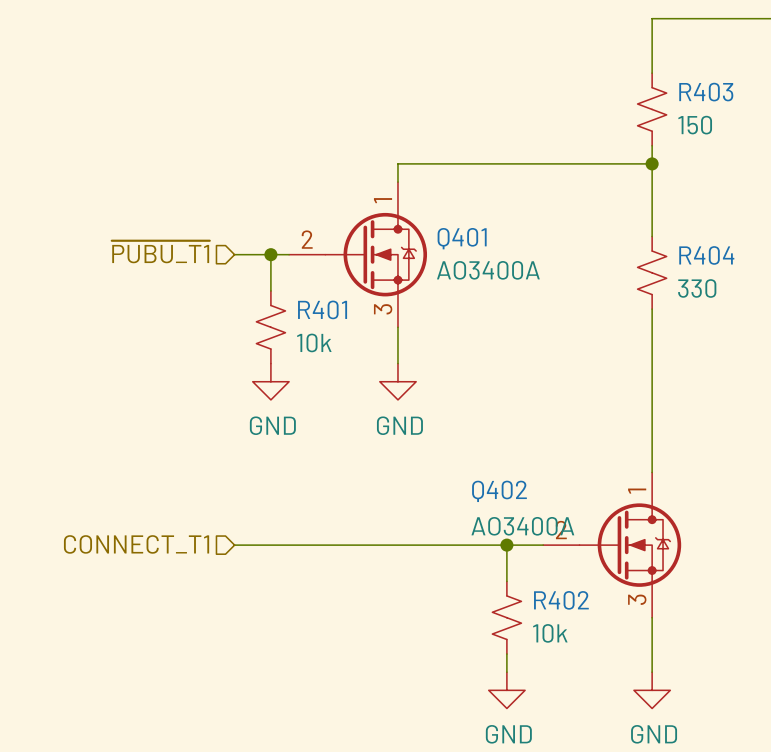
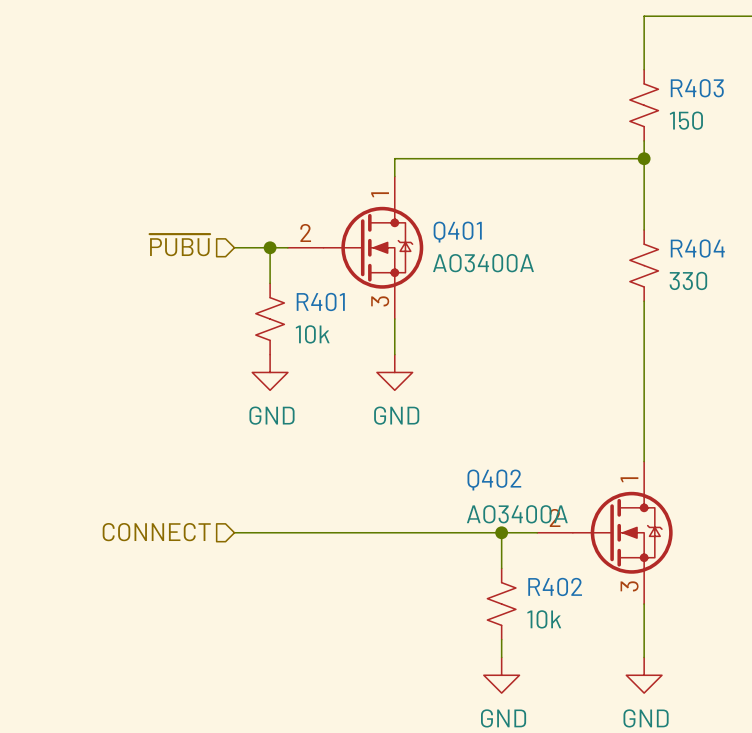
hierarchical label: ~{PUBU_T1} (160, 252) -> ~{PUBU} (179, 245)
hierarchical label: CONNECT_T1 (136, 544) -> CONNECT (156, 532)

